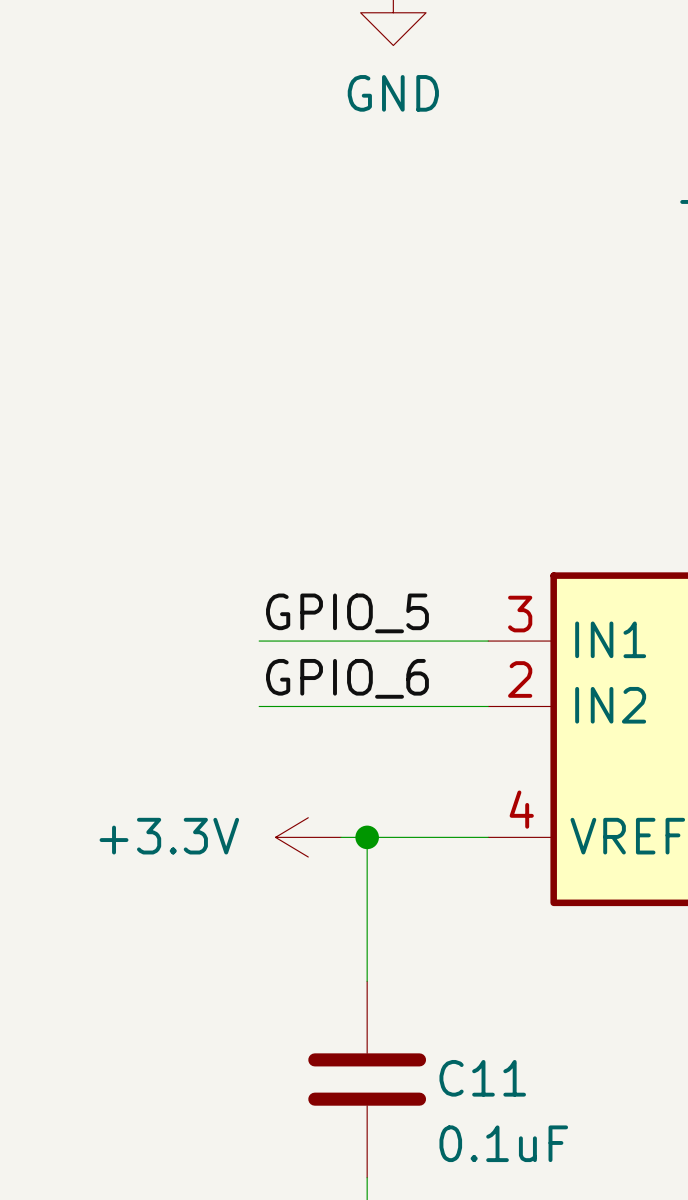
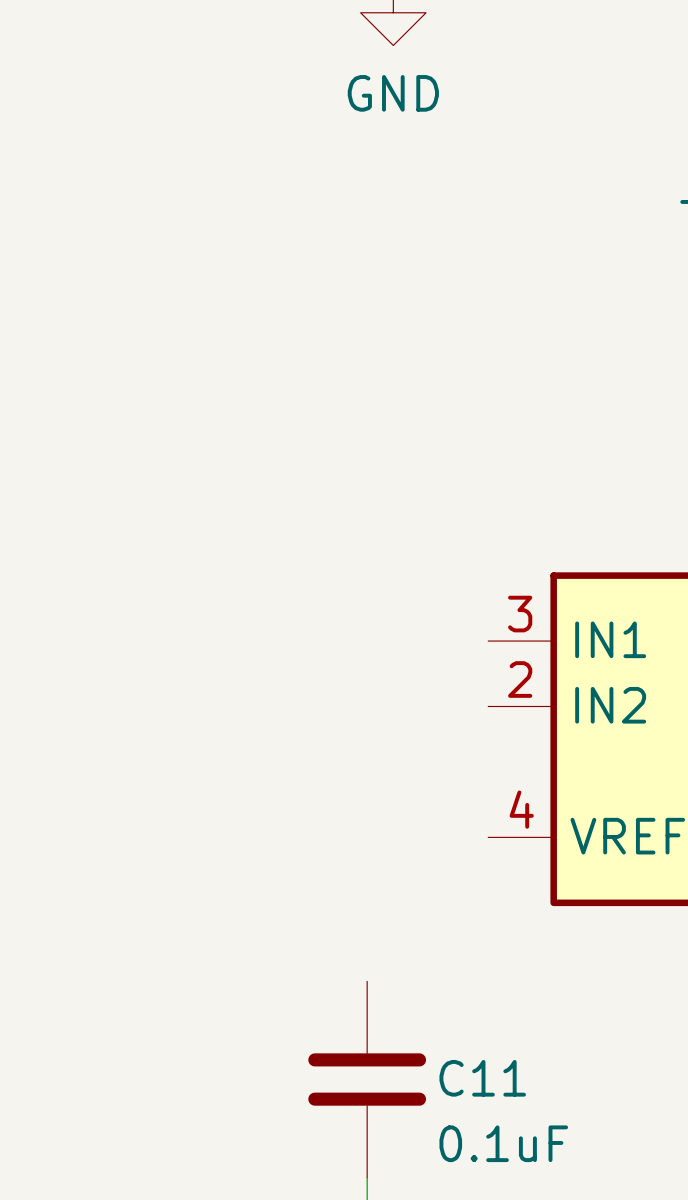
label: GPIO_5 (347, 613) -> none
wire: (259, 641) (488, 641) -> none
label: GPIO_6 (347, 678) -> none
wire: (259, 706) (488, 706) -> none
power symbol: +3.3V (308, 837) -> none
wire: (340, 837) (488, 837) -> none
wire: (367, 837) (367, 981) -> none
junction: (367, 837) -> none

